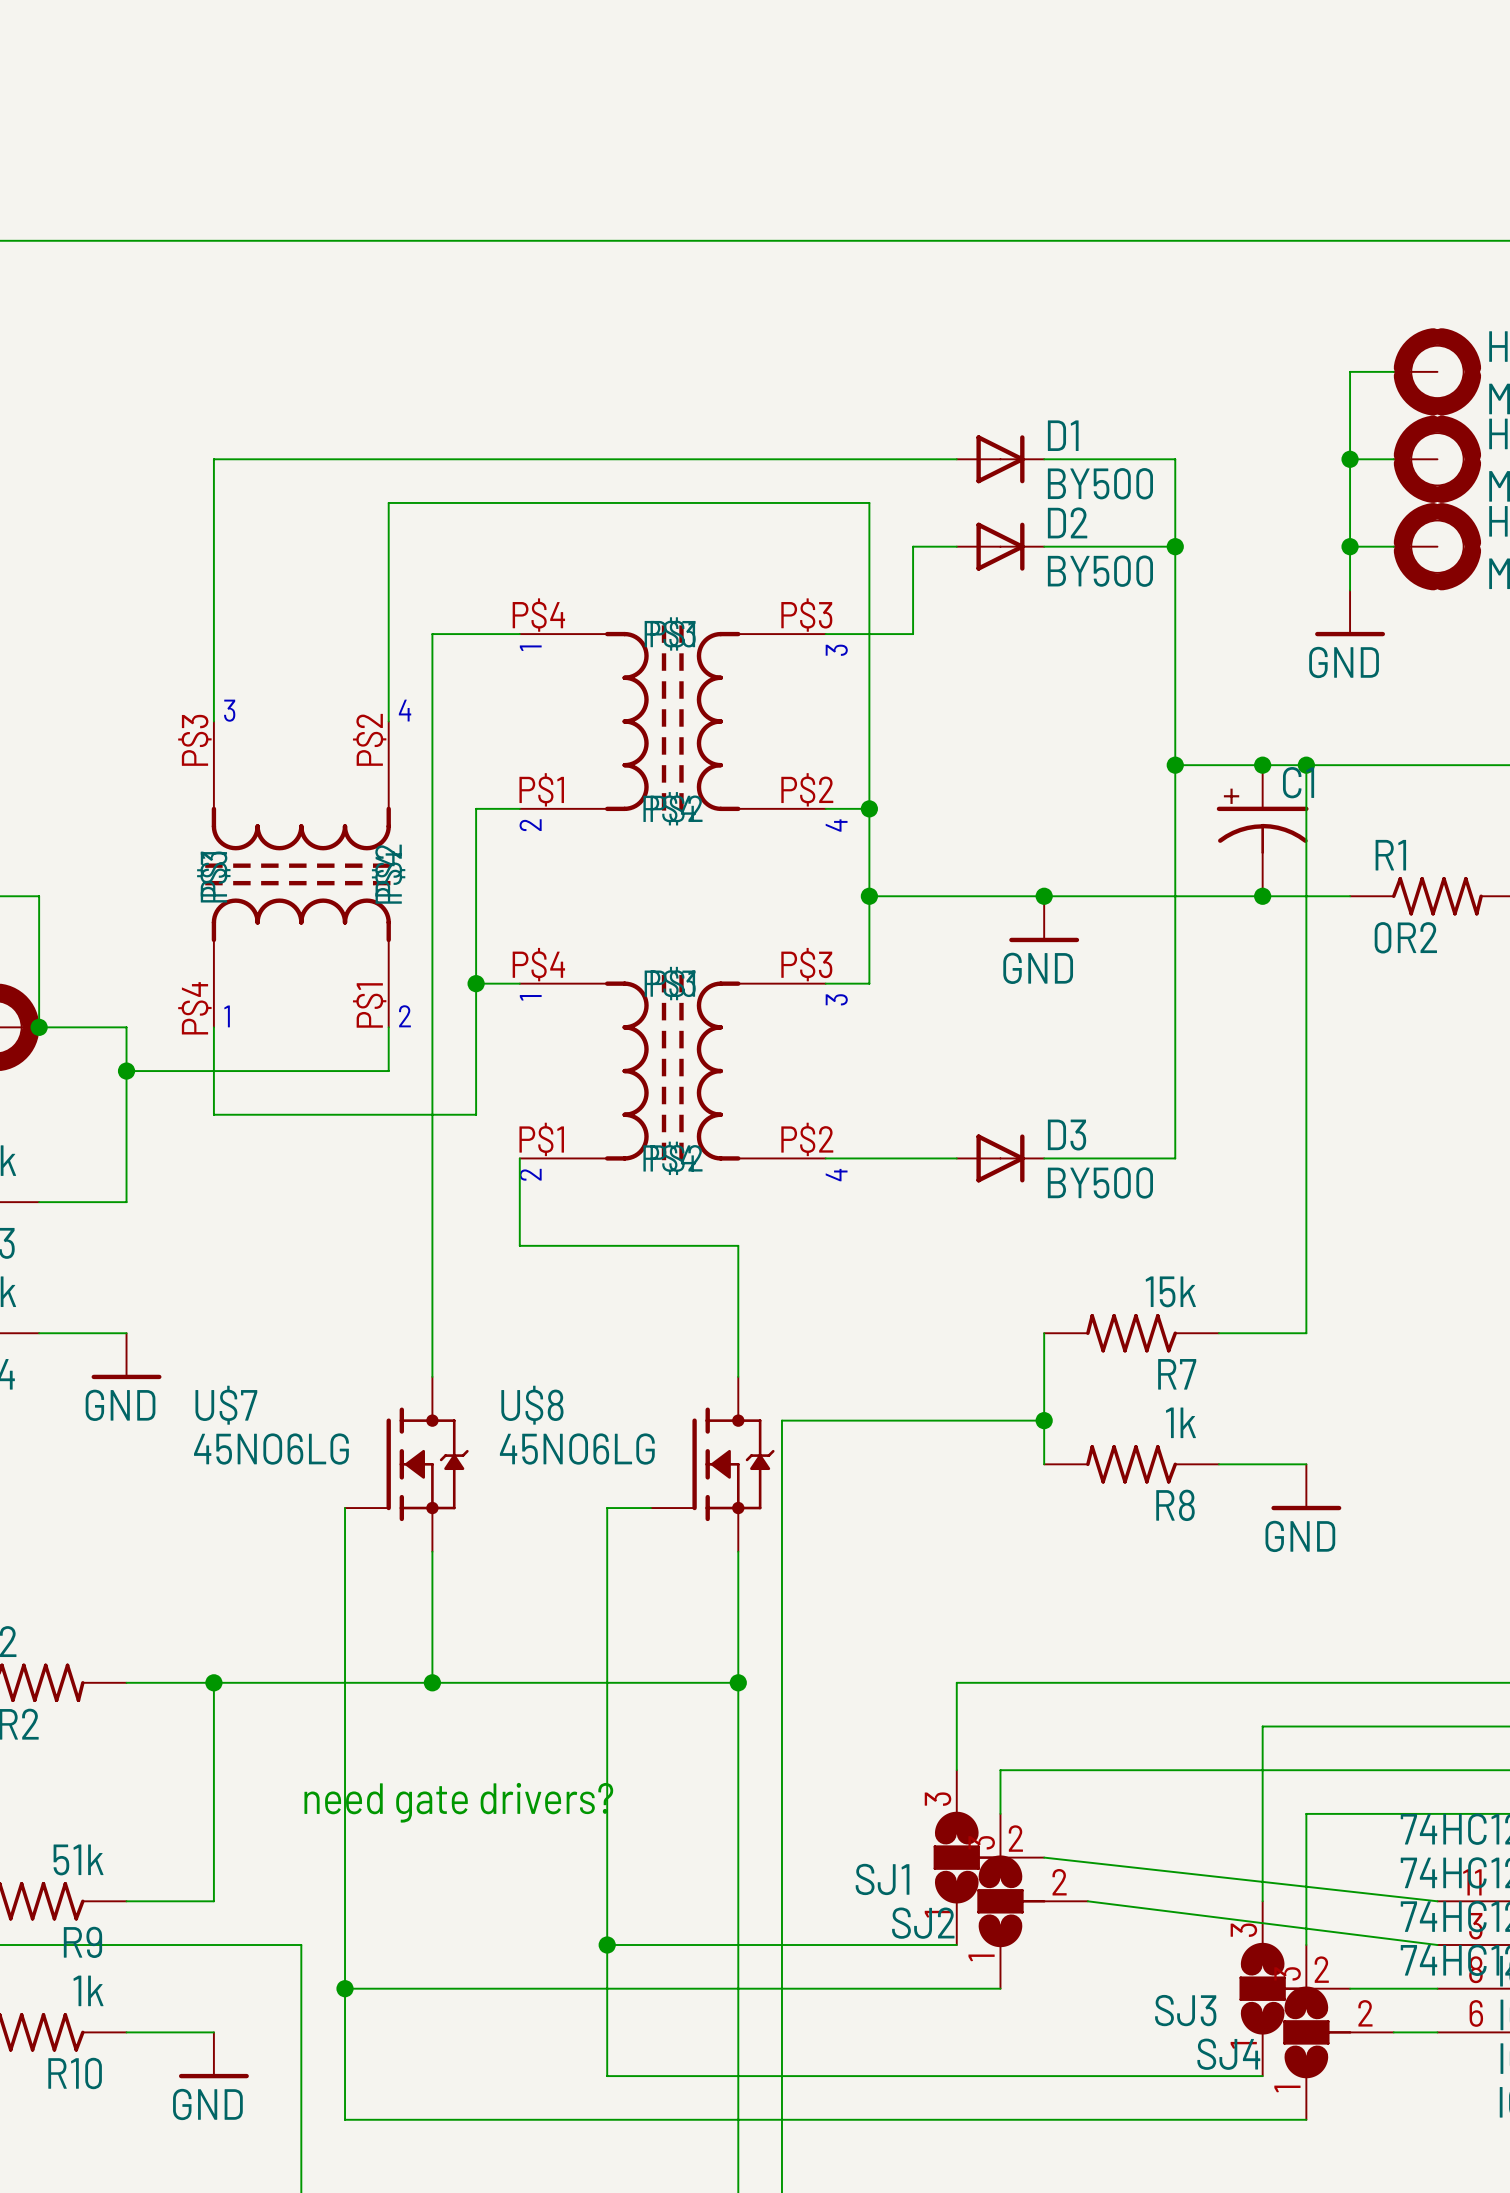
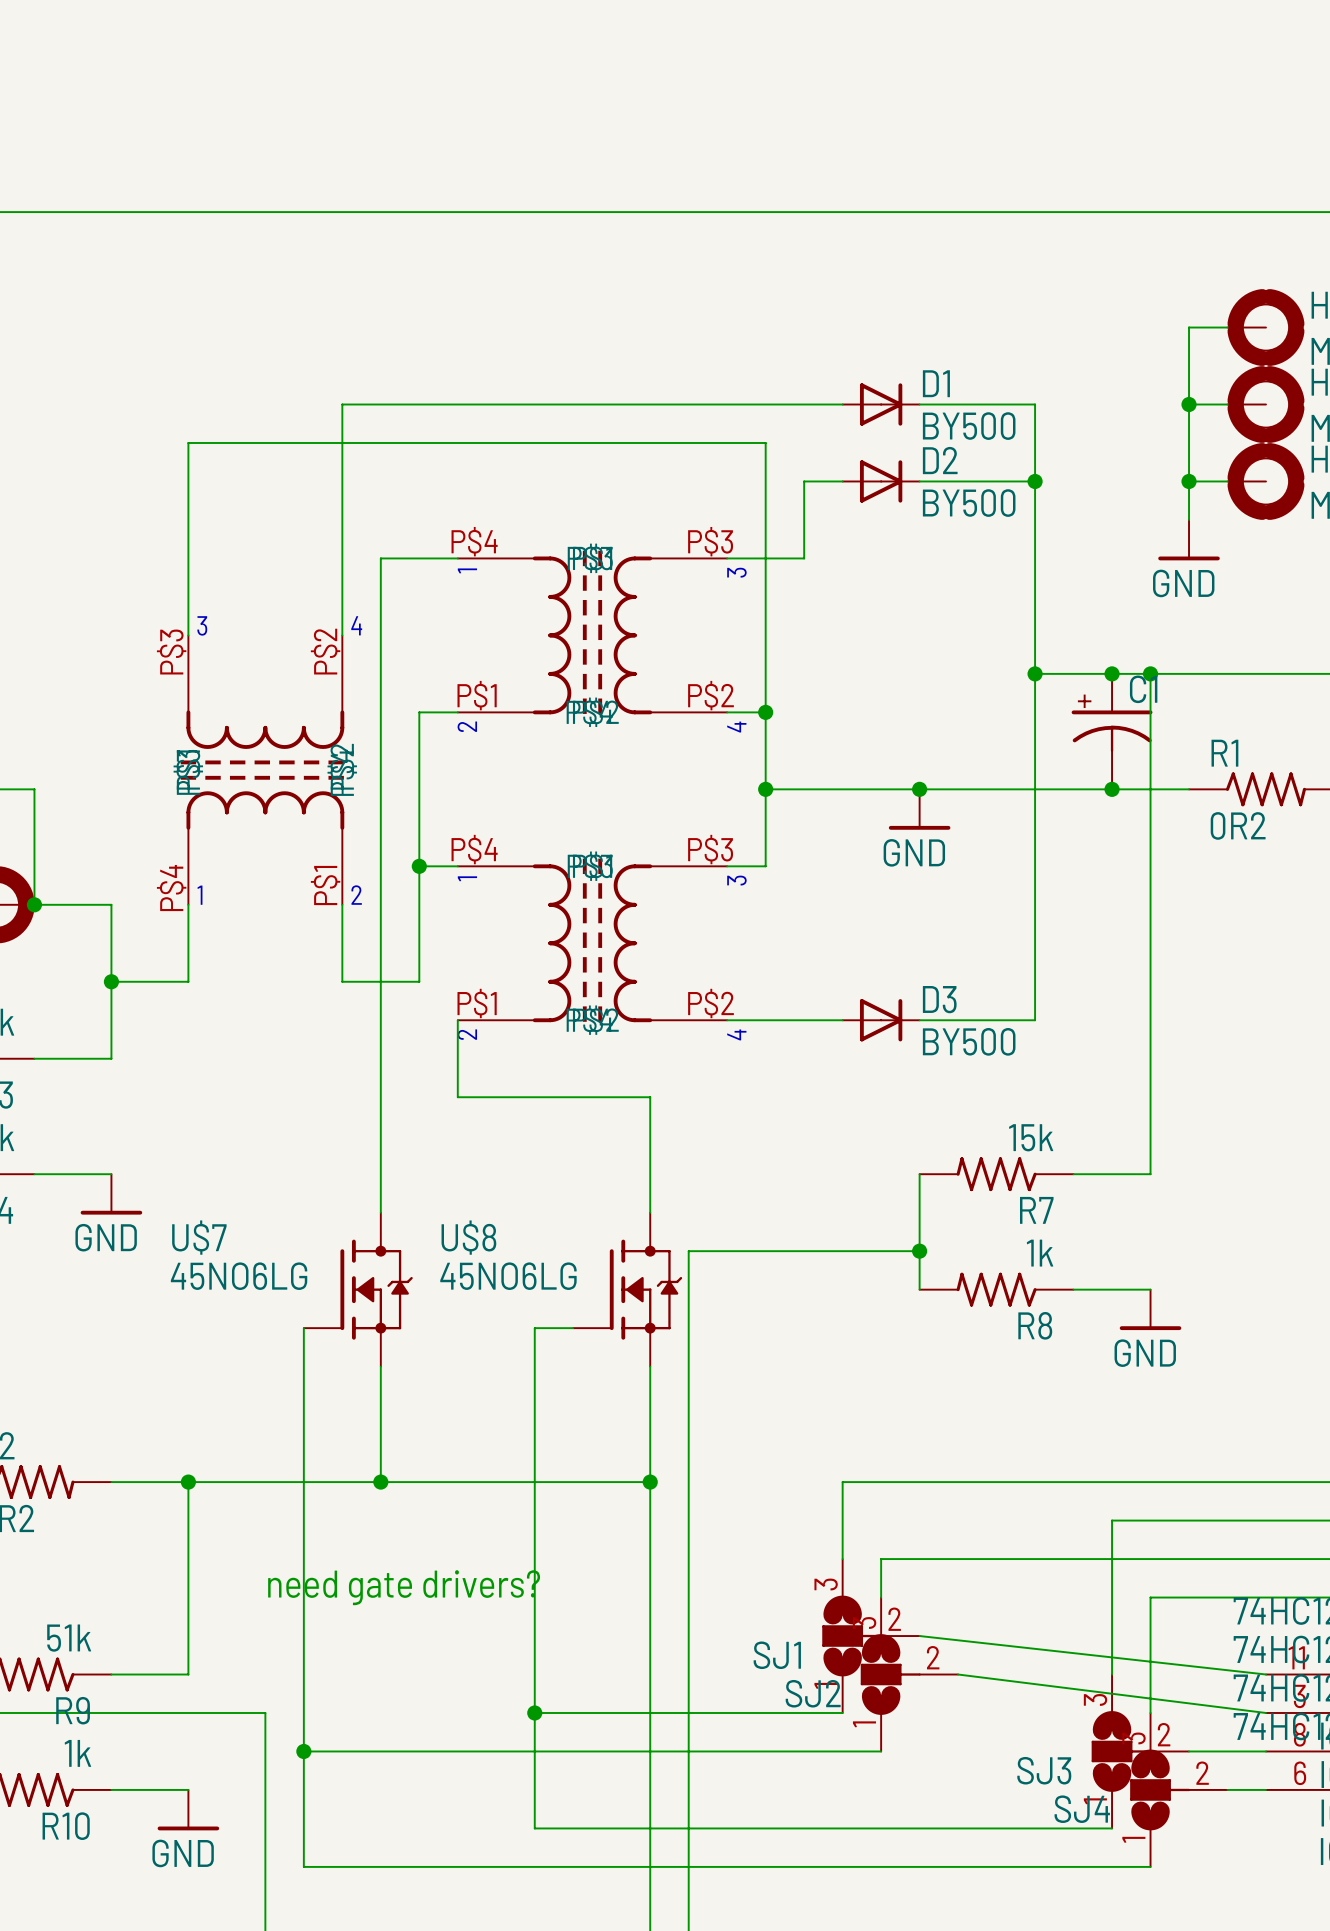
wire: (388, 459) (213, 459) (213, 502) -> (342, 404) (342, 442) (188, 442)
wire: (126, 1071) (388, 1071) -> none
junction position: (126, 1071) -> (111, 981)
wire: none -> (111, 981) (188, 981)
wire: (213, 1114) (388, 1114) -> (342, 943) (342, 981)

